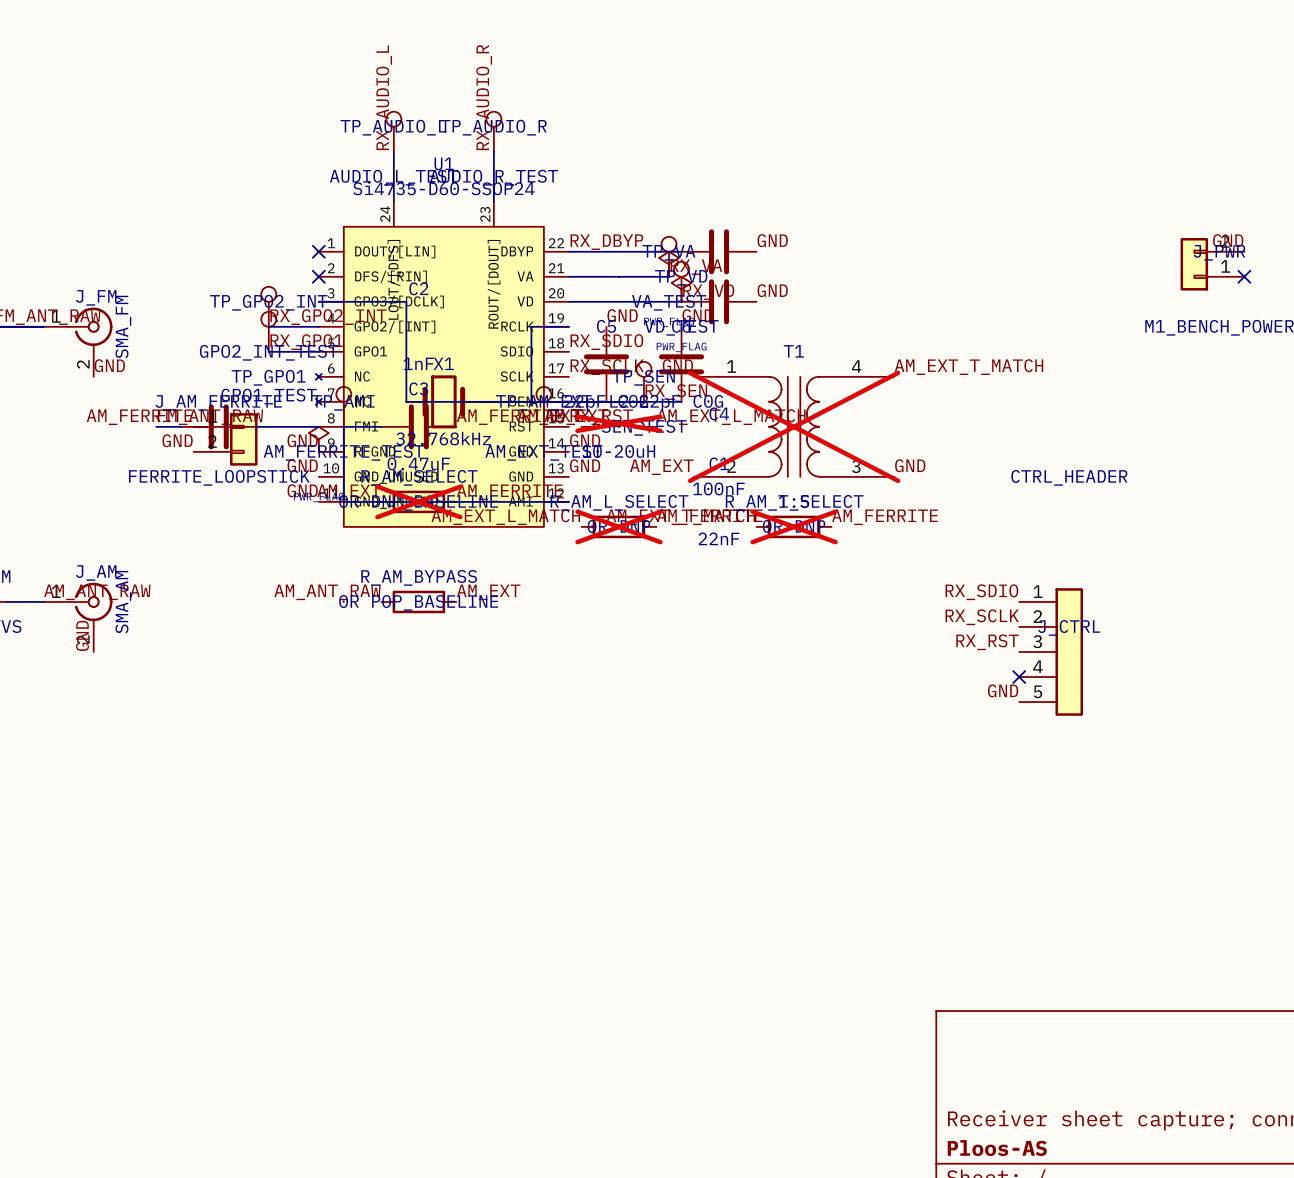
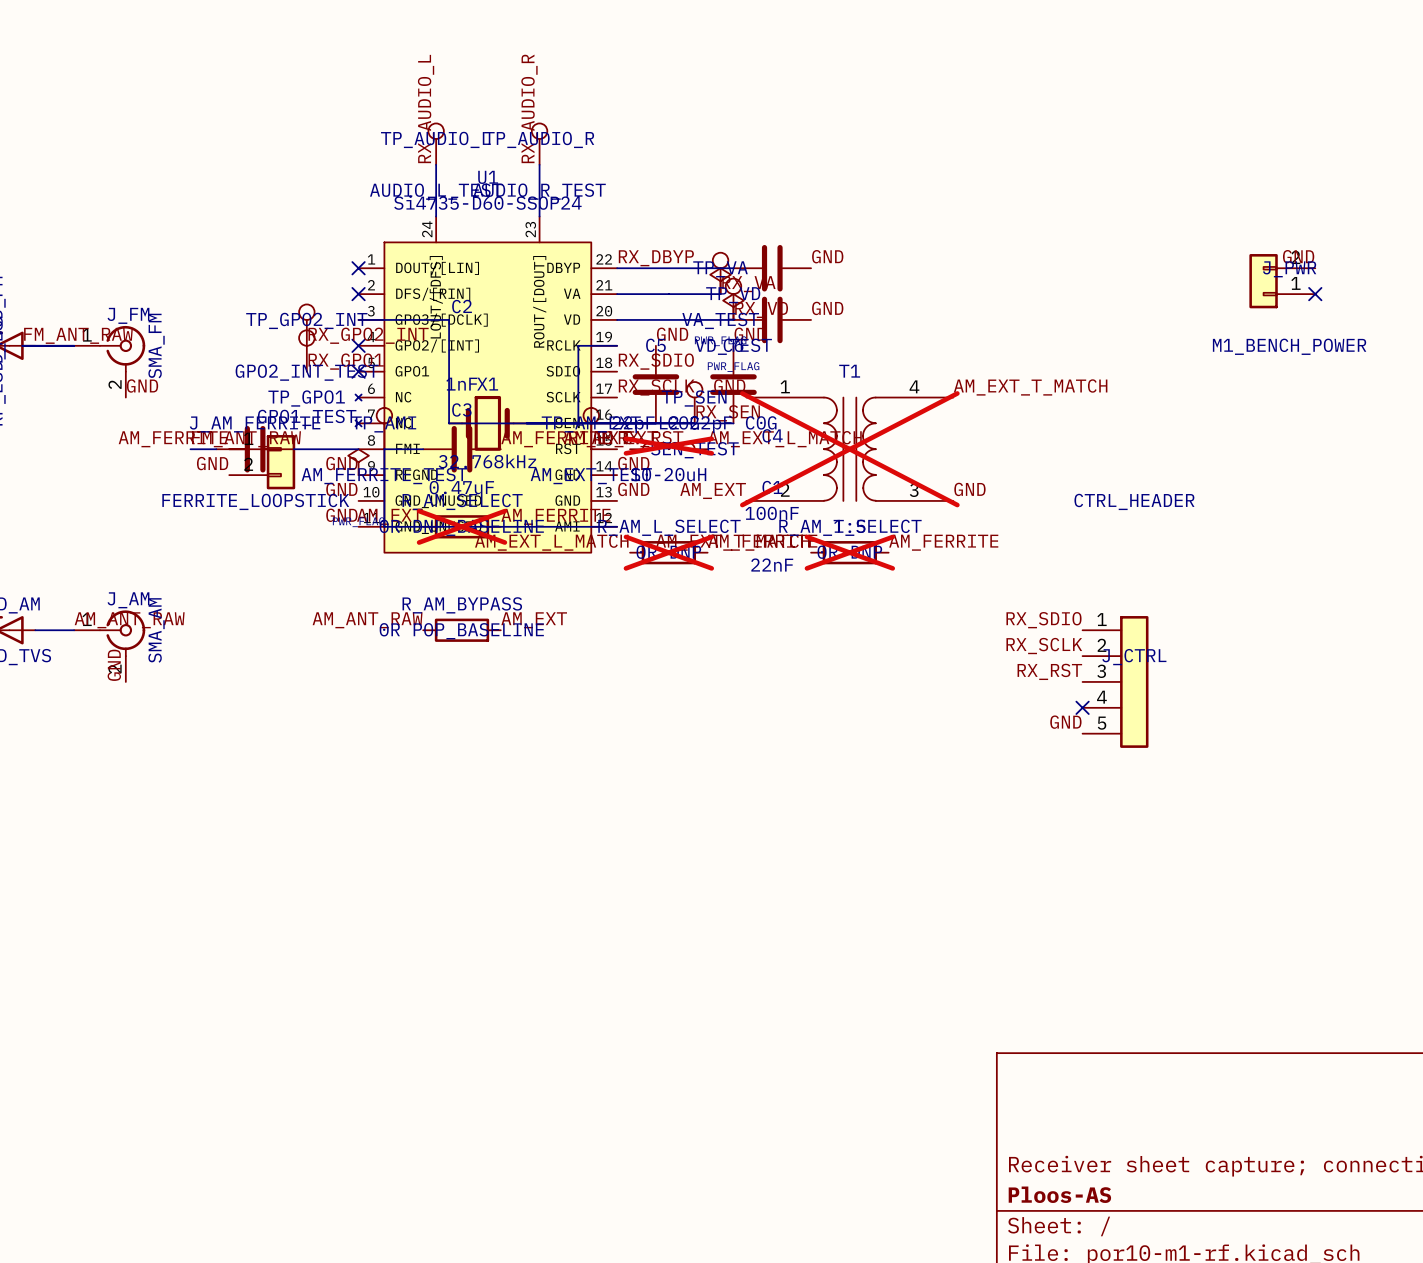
wire: (268, 326) (318, 326) -> none
no-connect mark: none -> (358, 345)
wire: (268, 351) (318, 351) -> none
no-connect mark: none -> (358, 371)

